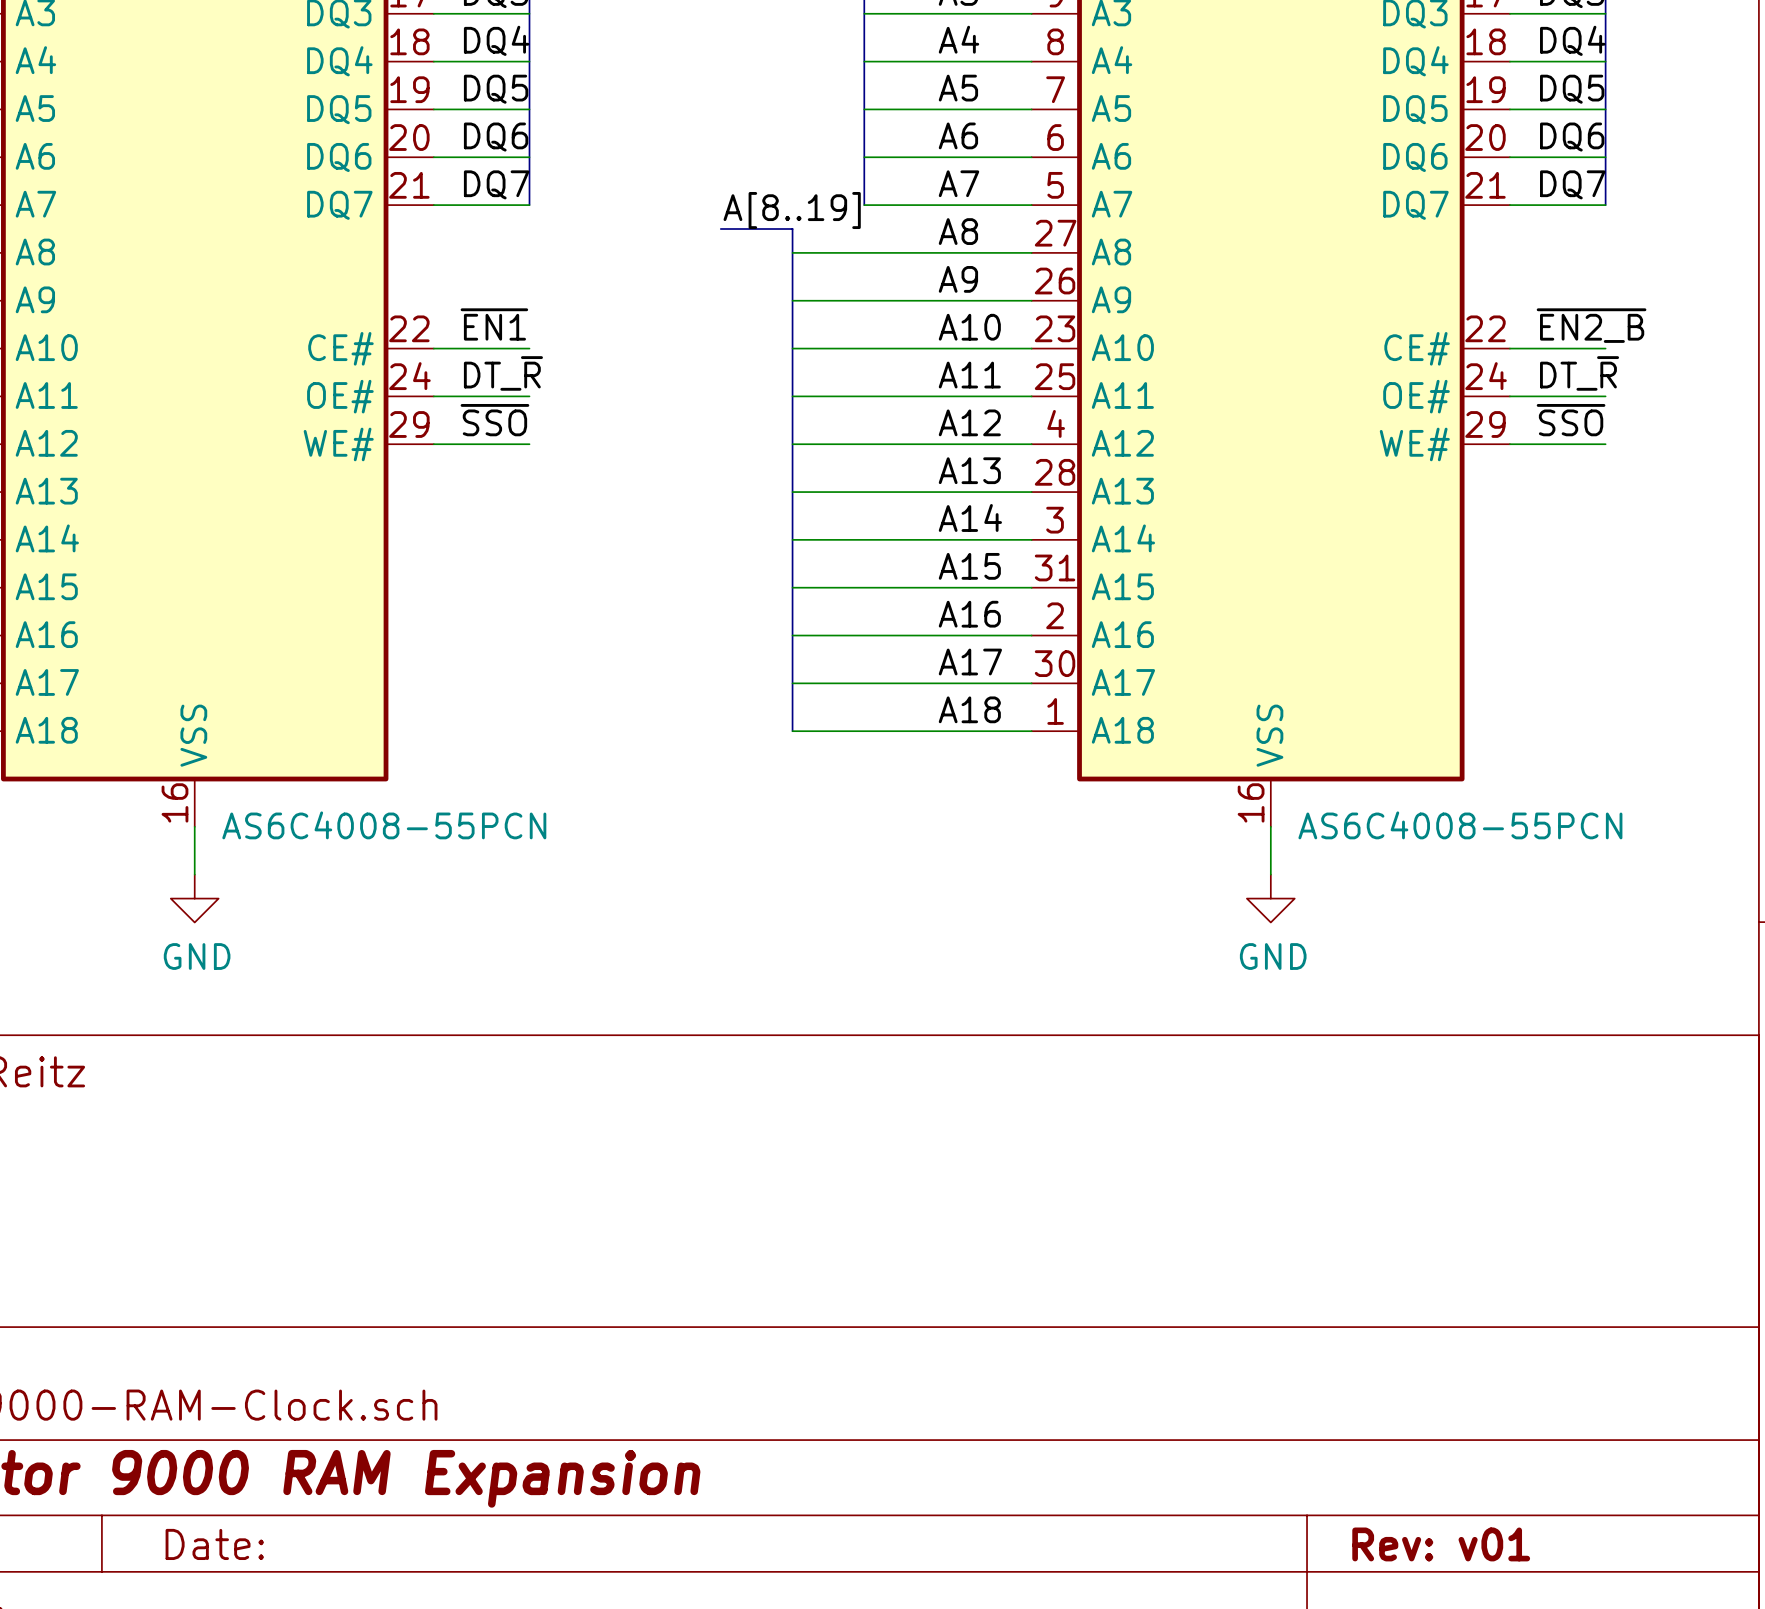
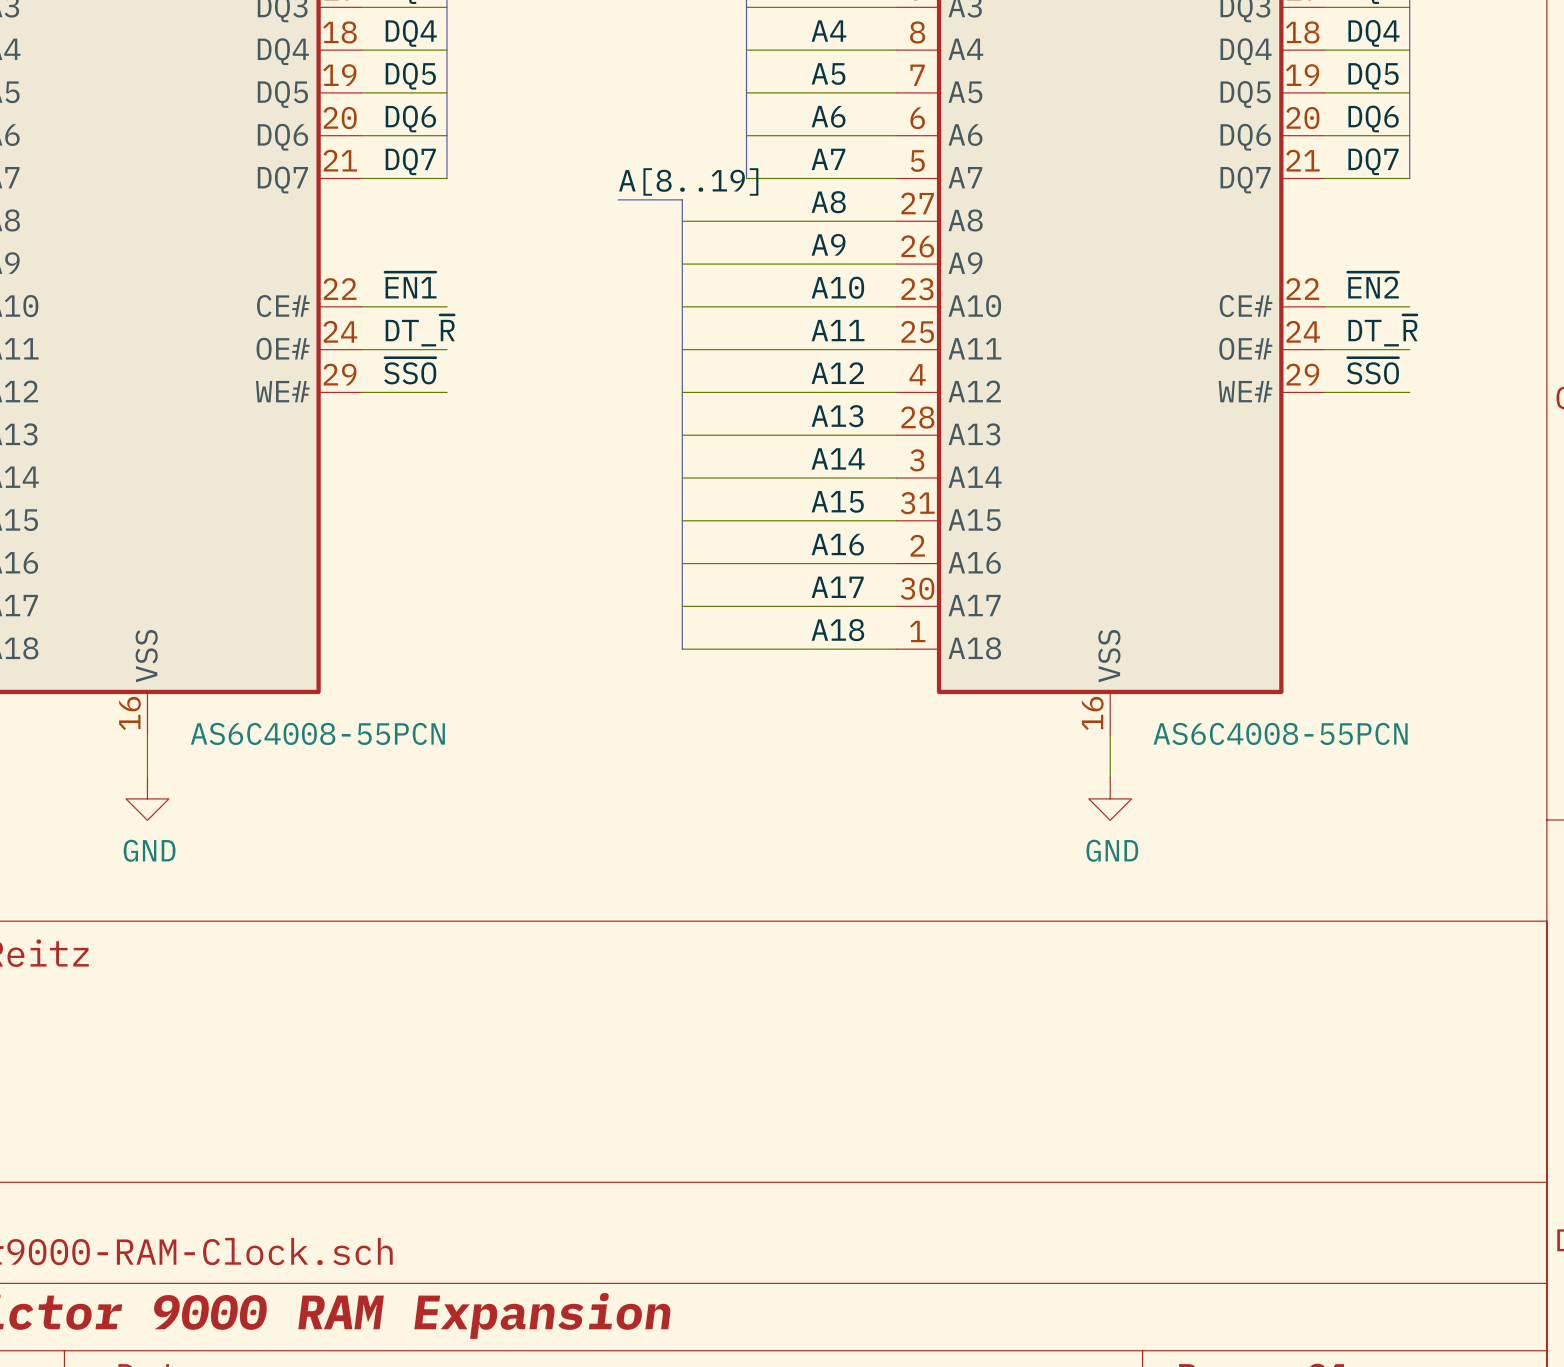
label: ~{EN2_B} (1591, 325) -> ~{EN2} (1373, 285)

